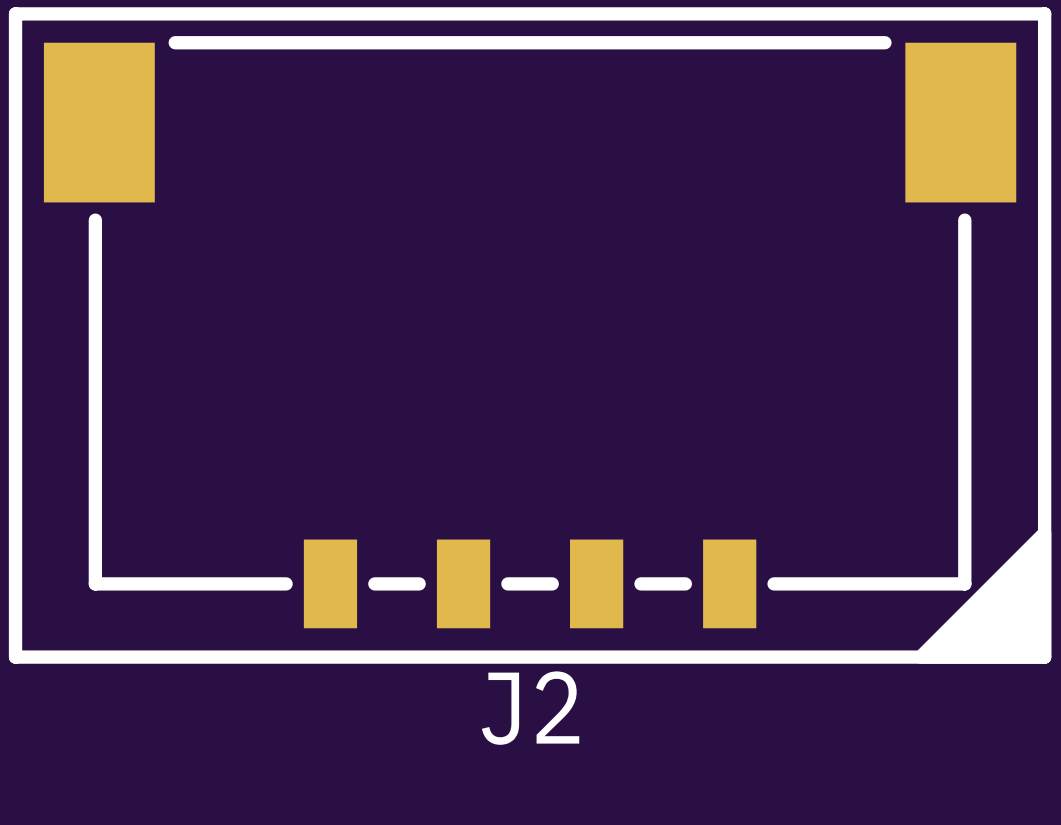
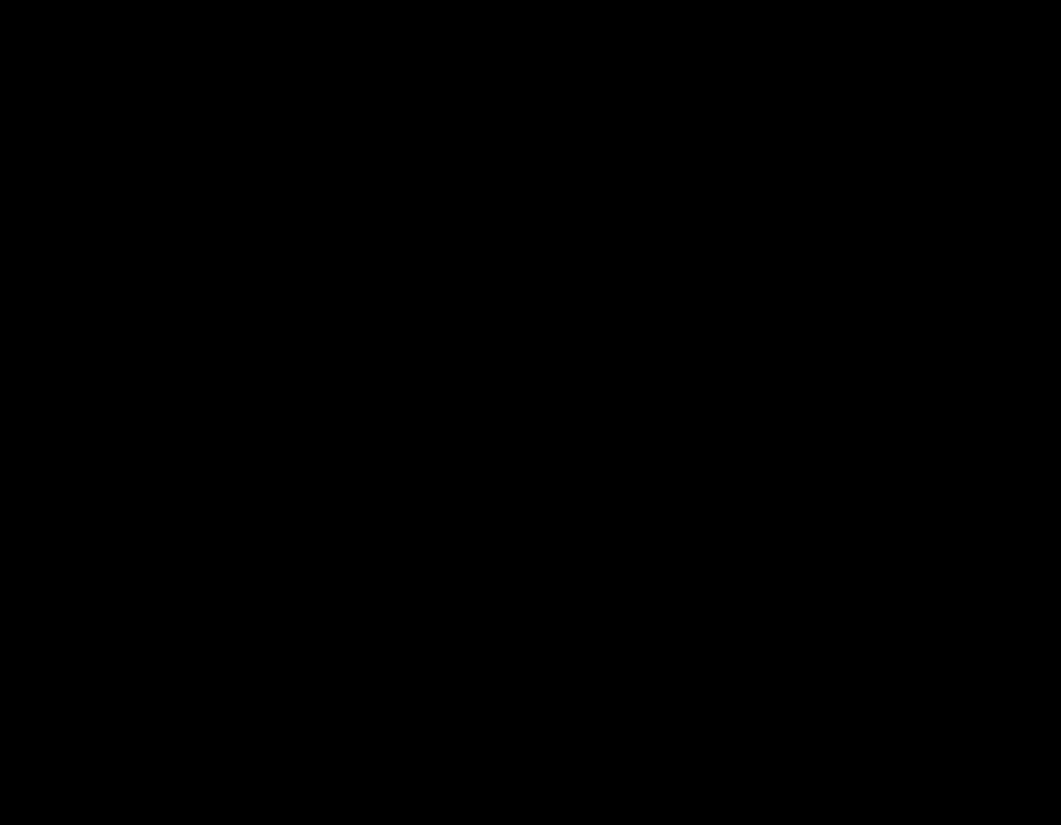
J2: (530, 335) -> none

